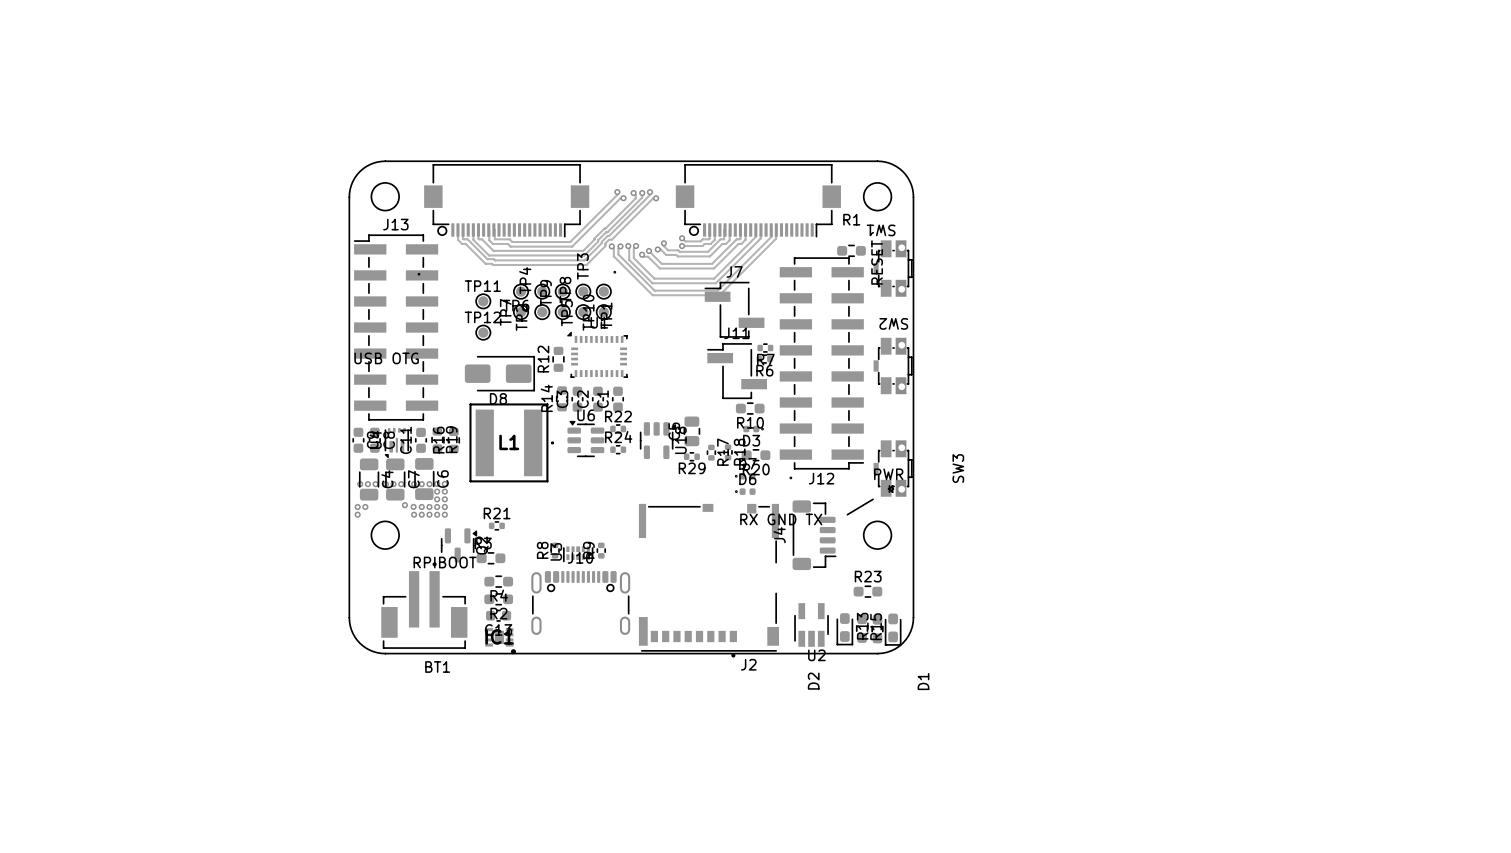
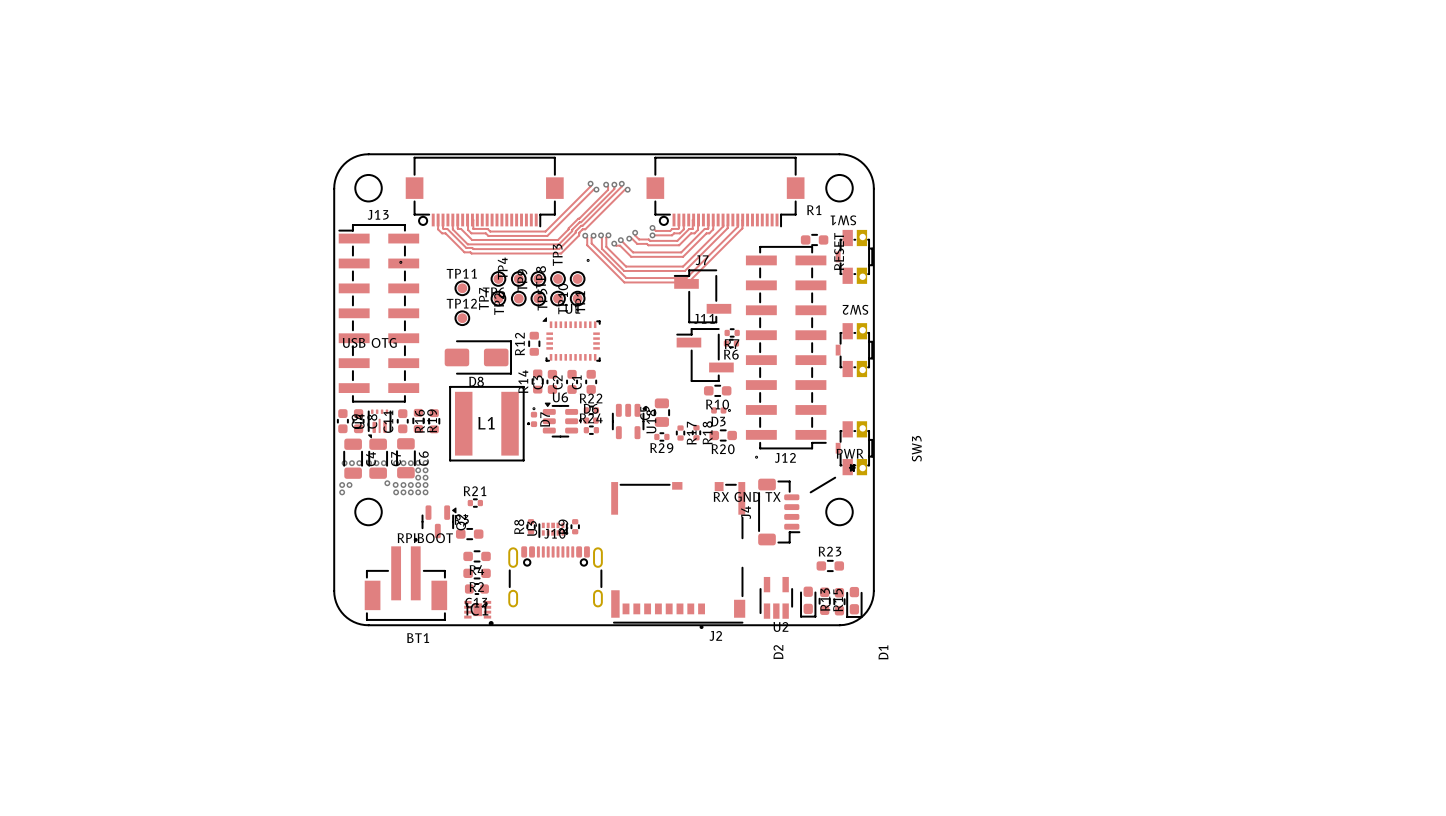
D7 rotation: 0° (745, 476) -> 90° clockwise (533, 417)
D7 position: (745, 476) -> (533, 417)
D6 position: (745, 491) -> (589, 420)

